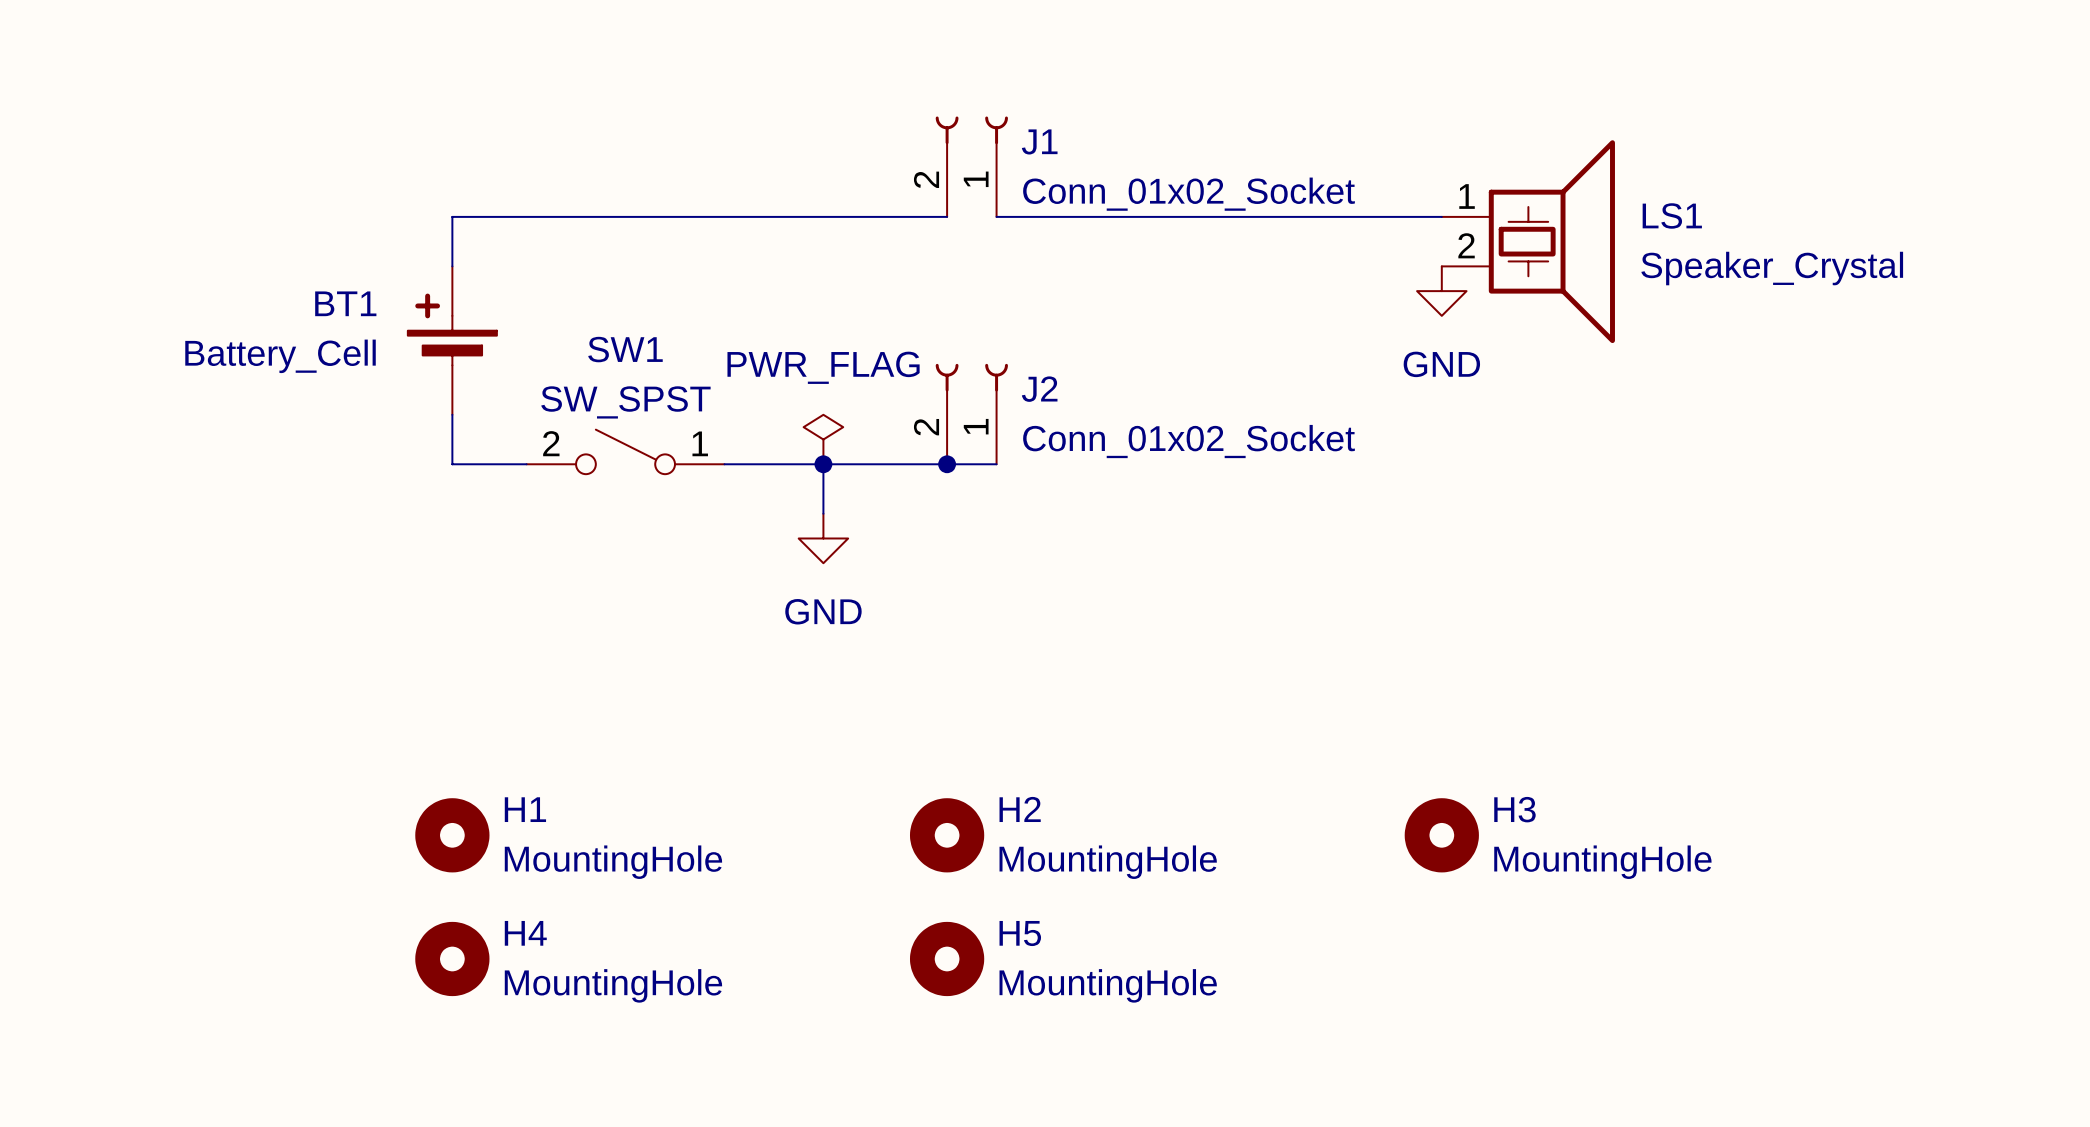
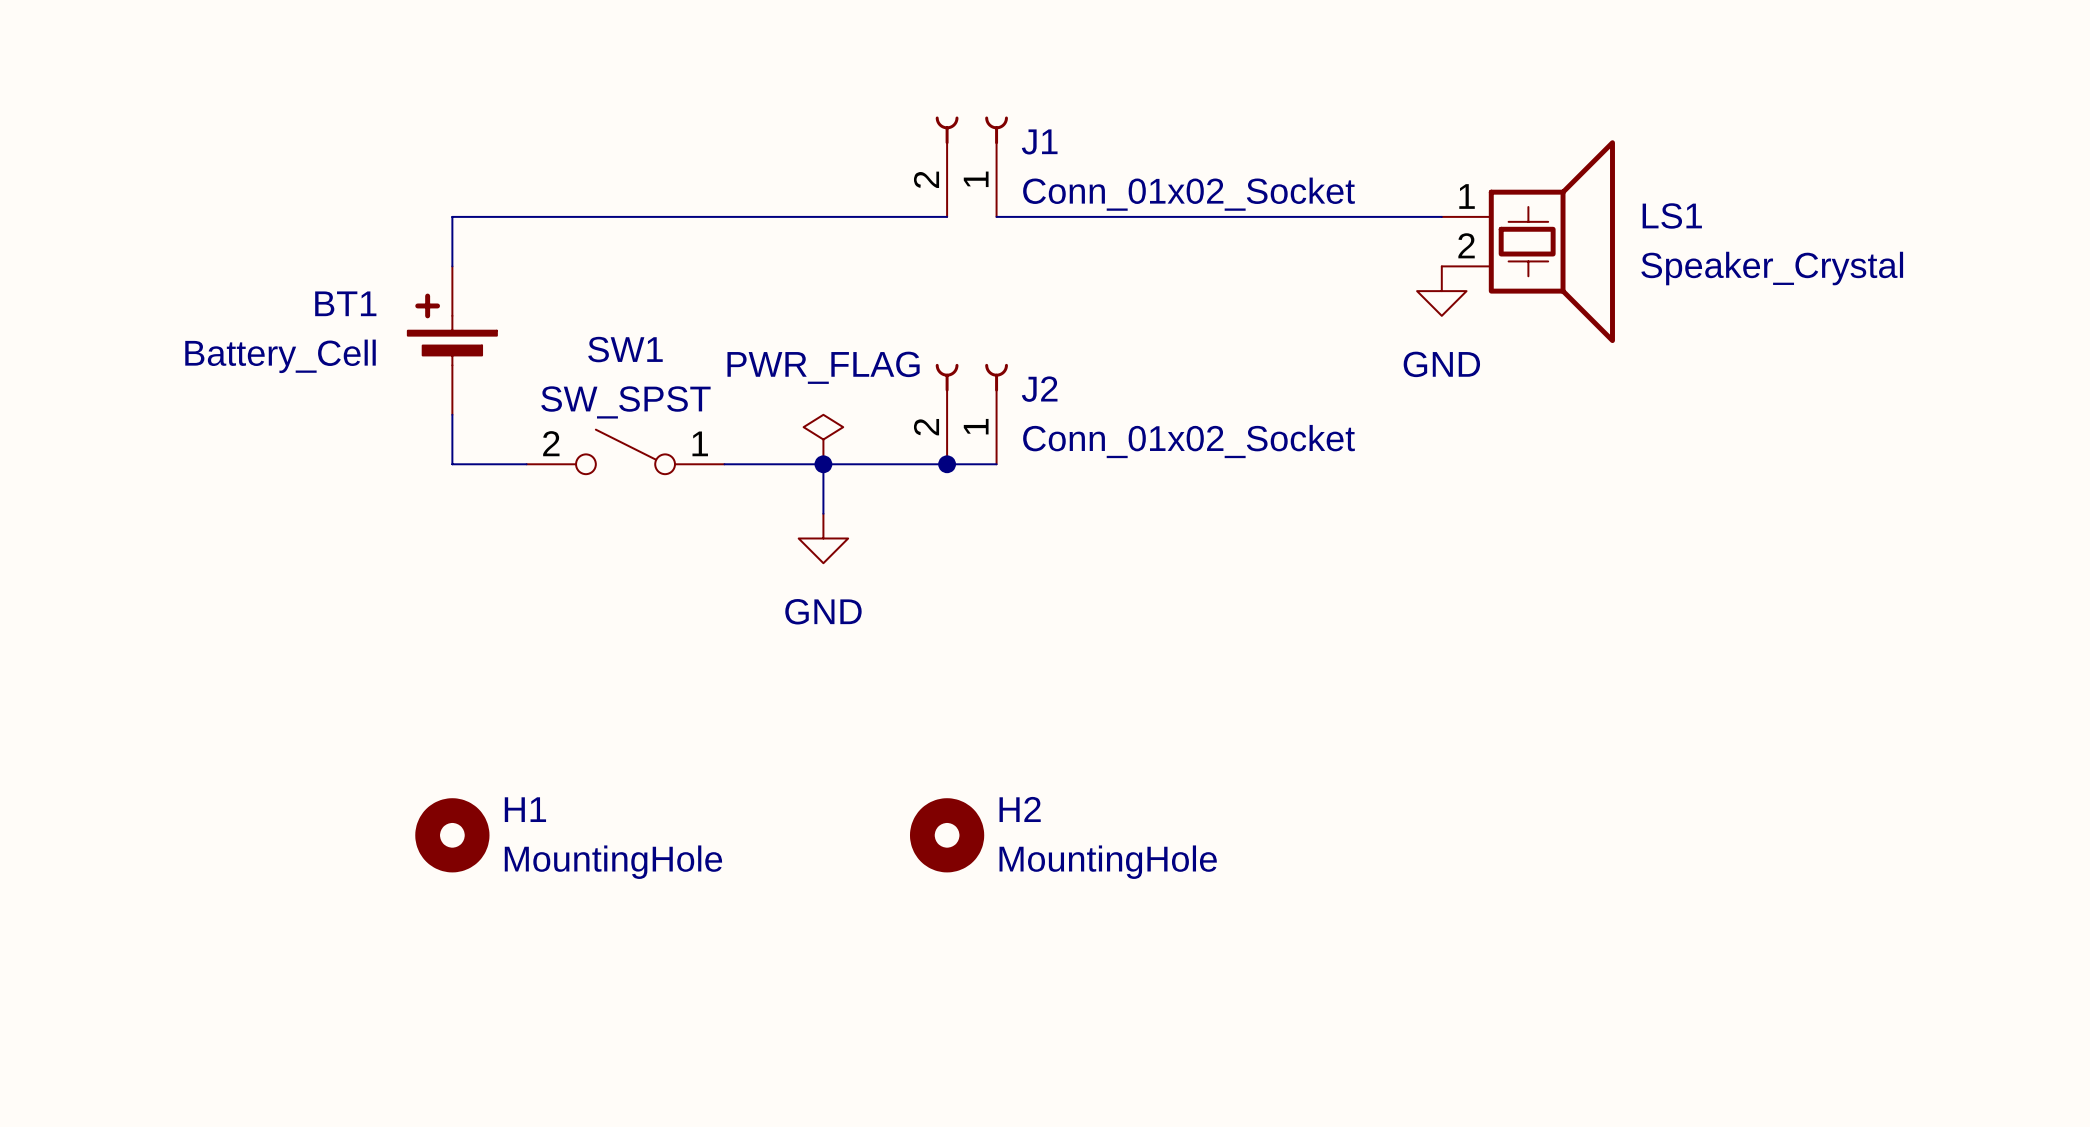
H3: MountingHole (1441, 835) -> none
H4: MountingHole (452, 958) -> none
H5: MountingHole (947, 958) -> none

